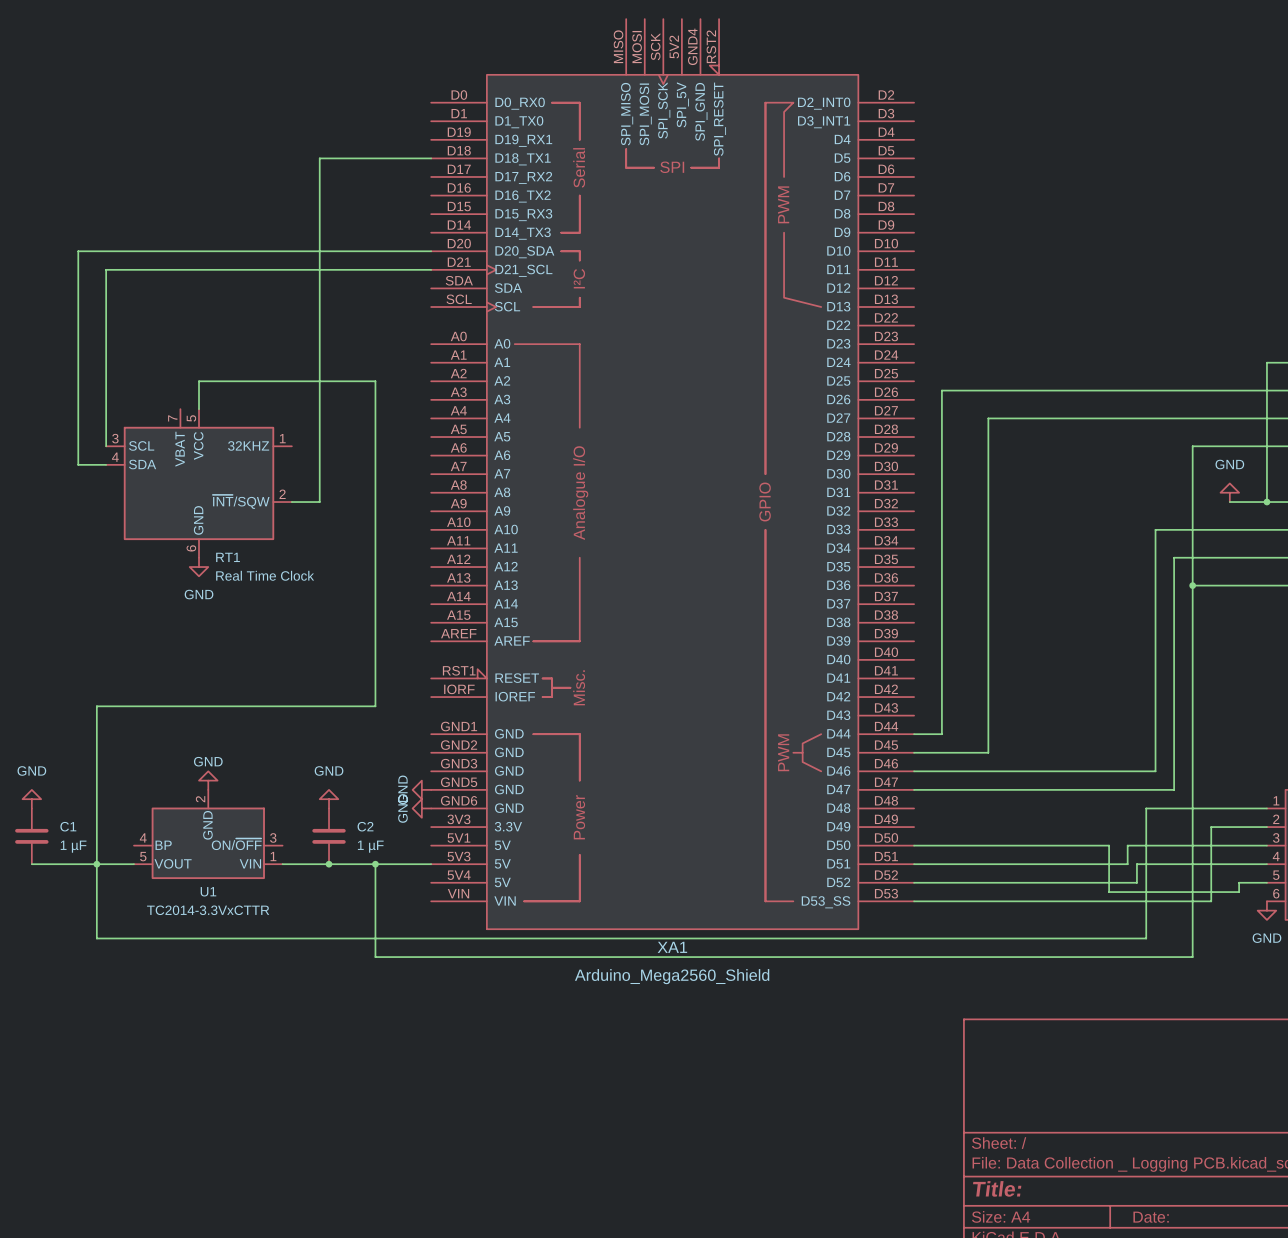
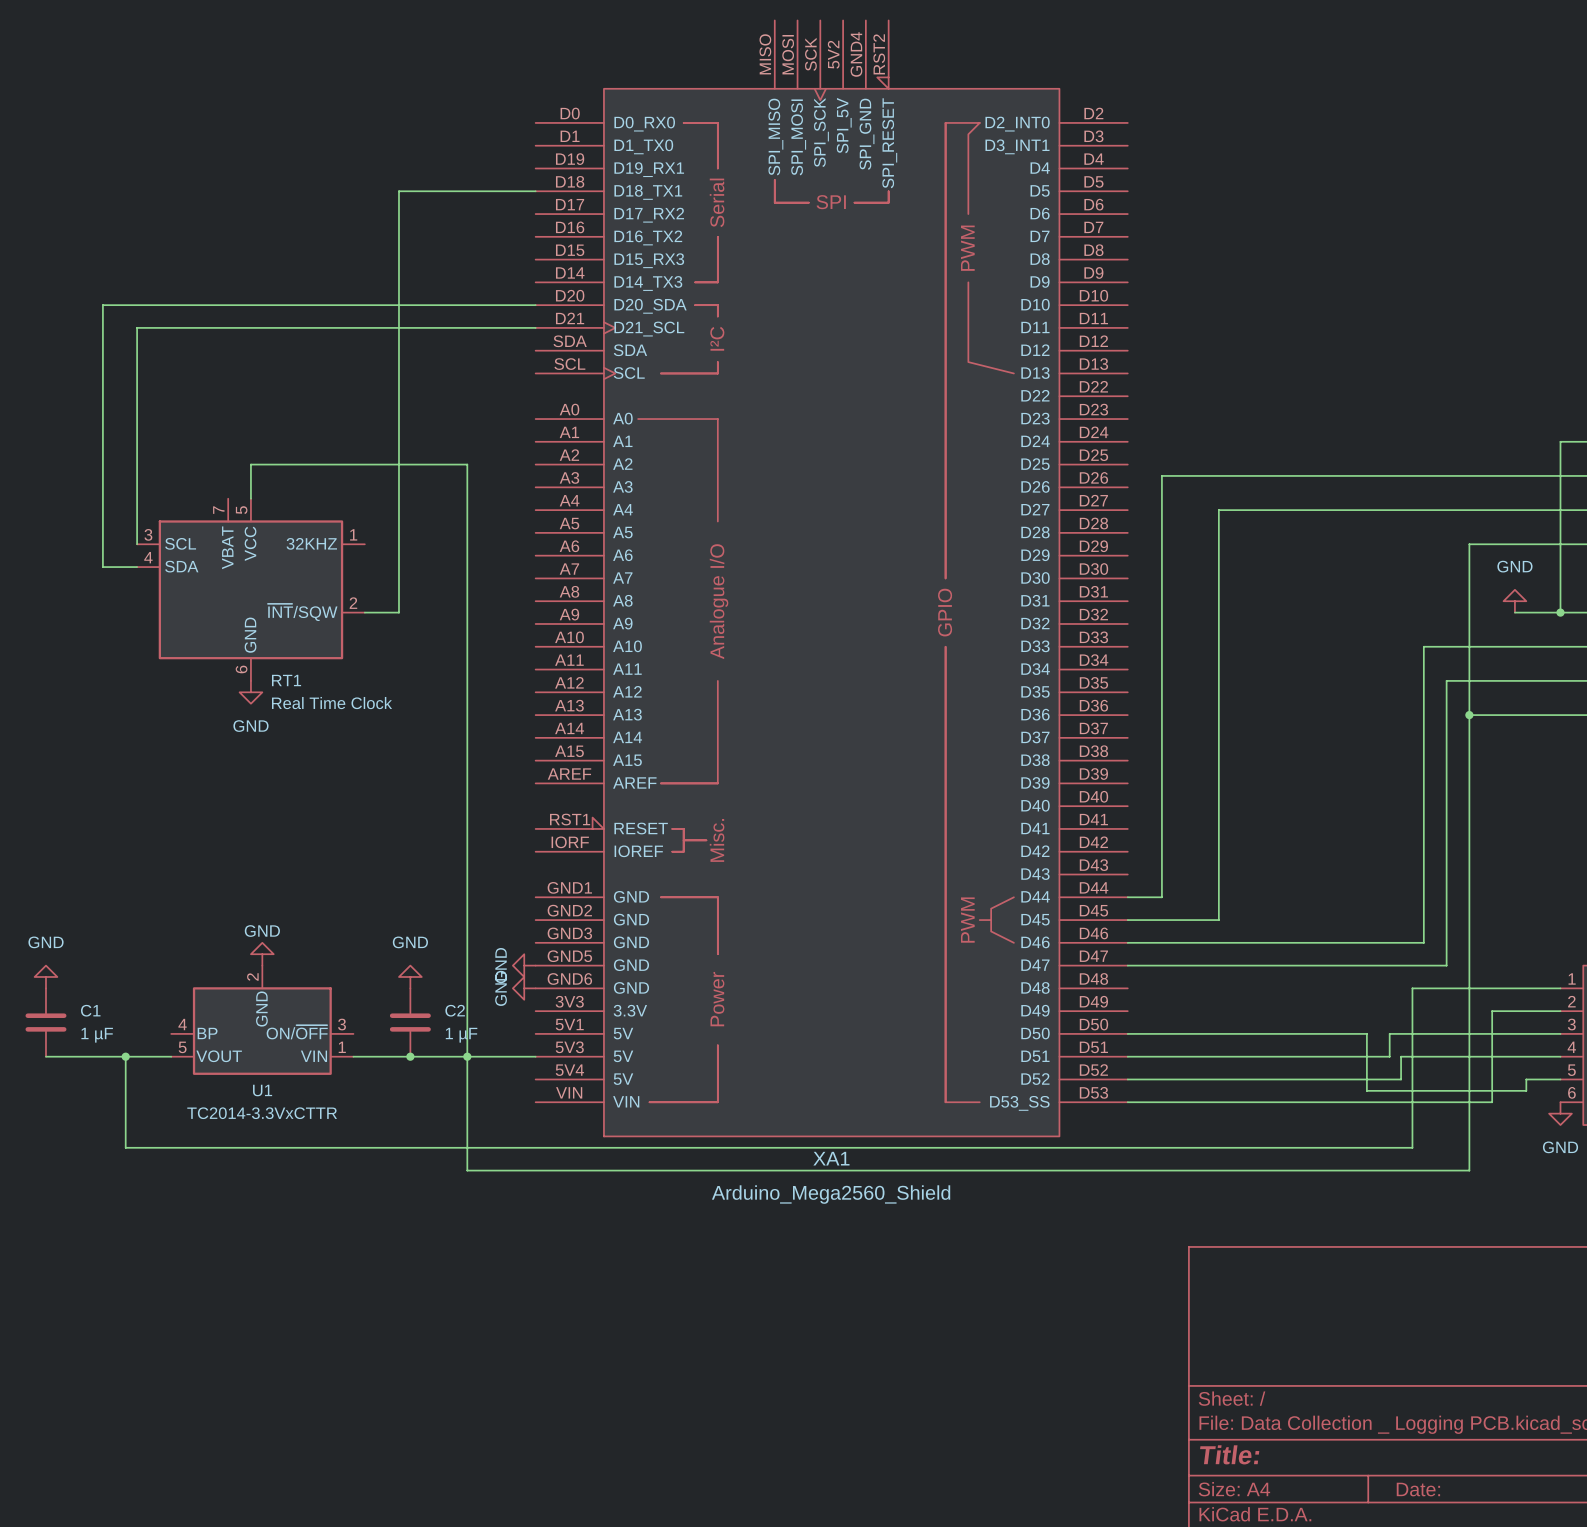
wire: (375, 706) (96, 706) (96, 864) -> (467, 863) (467, 1056)

